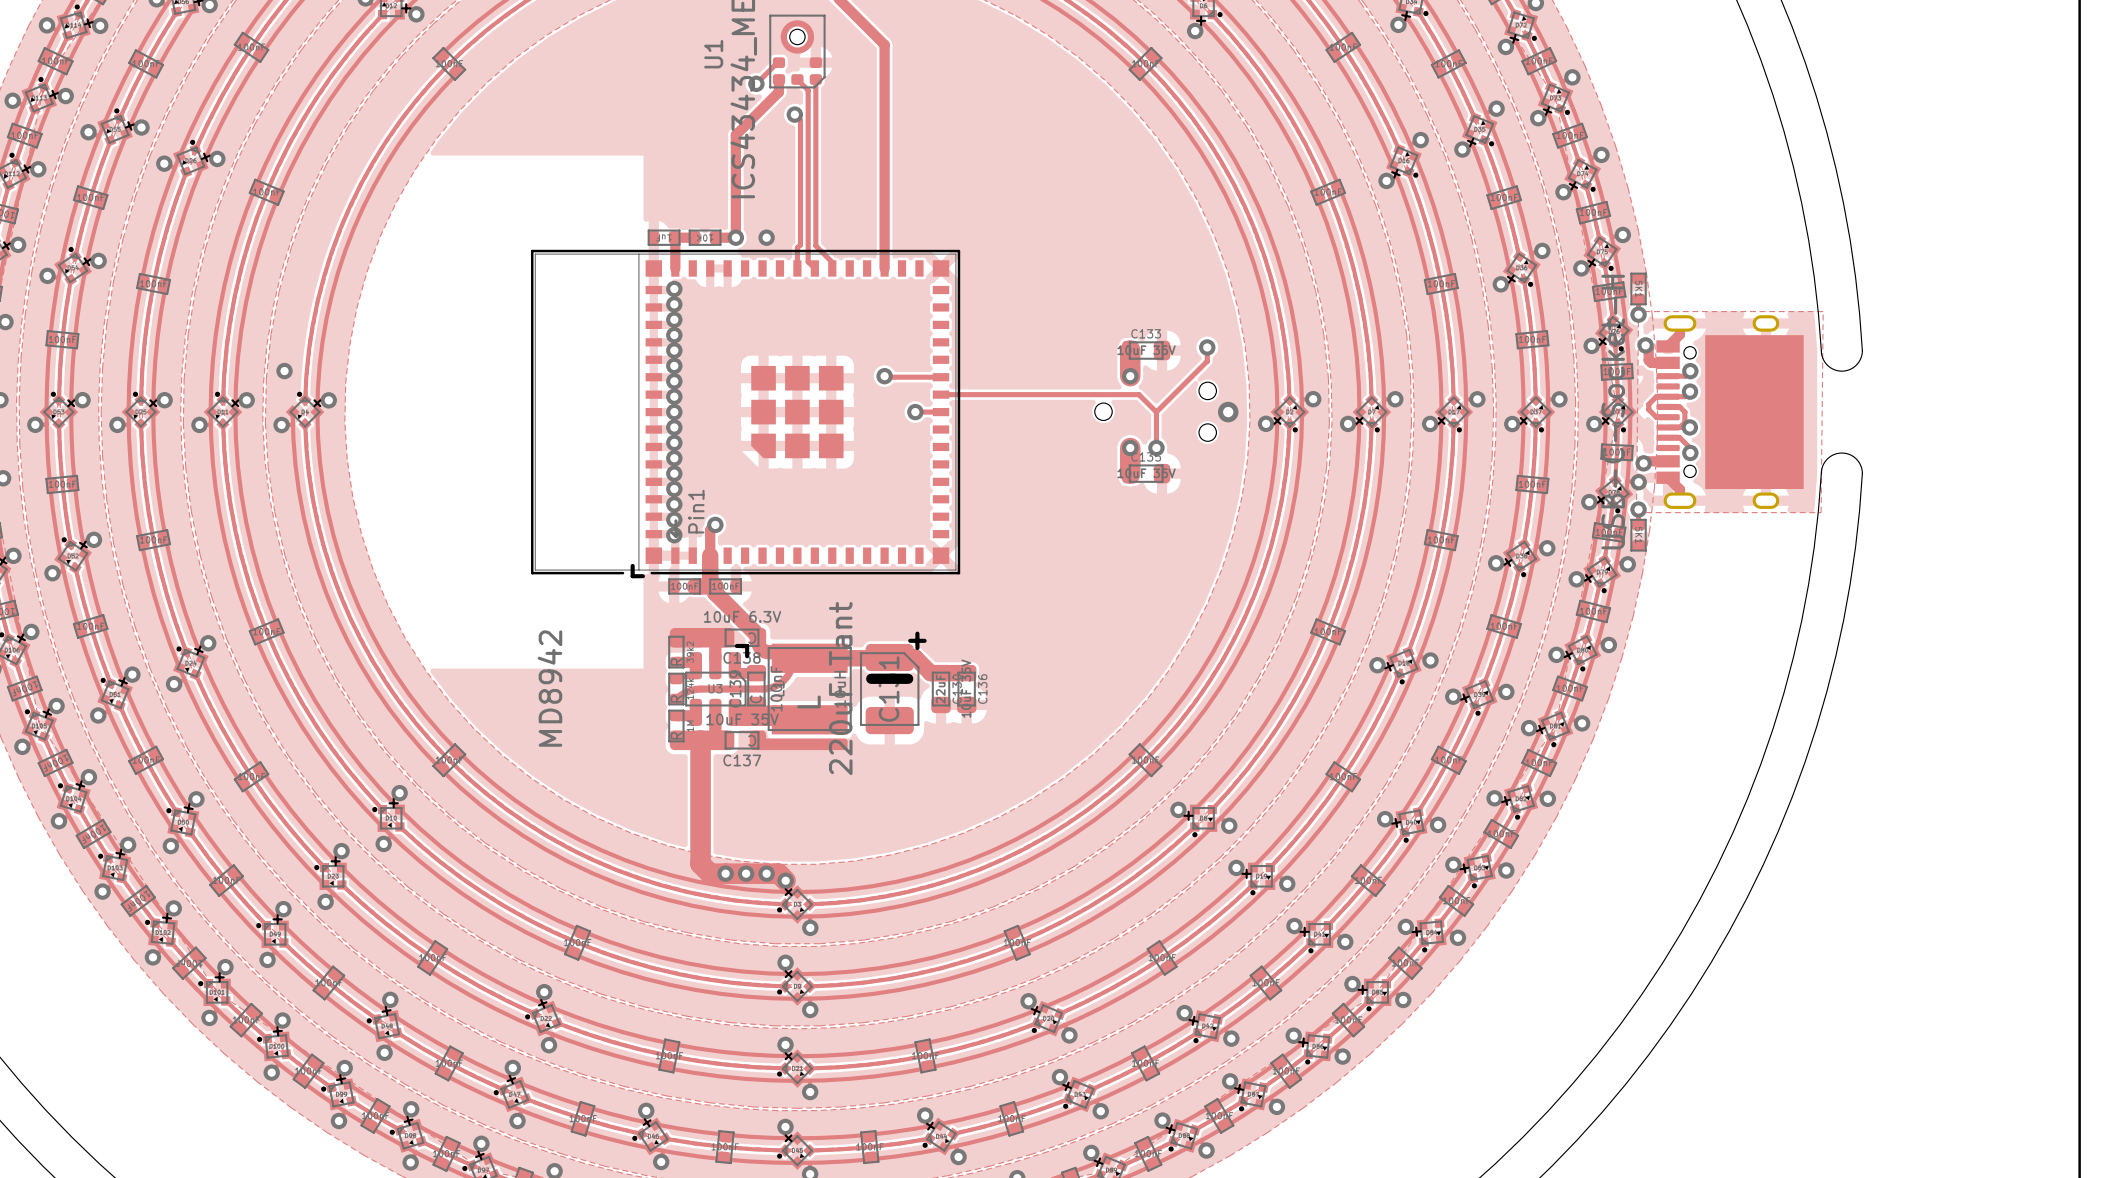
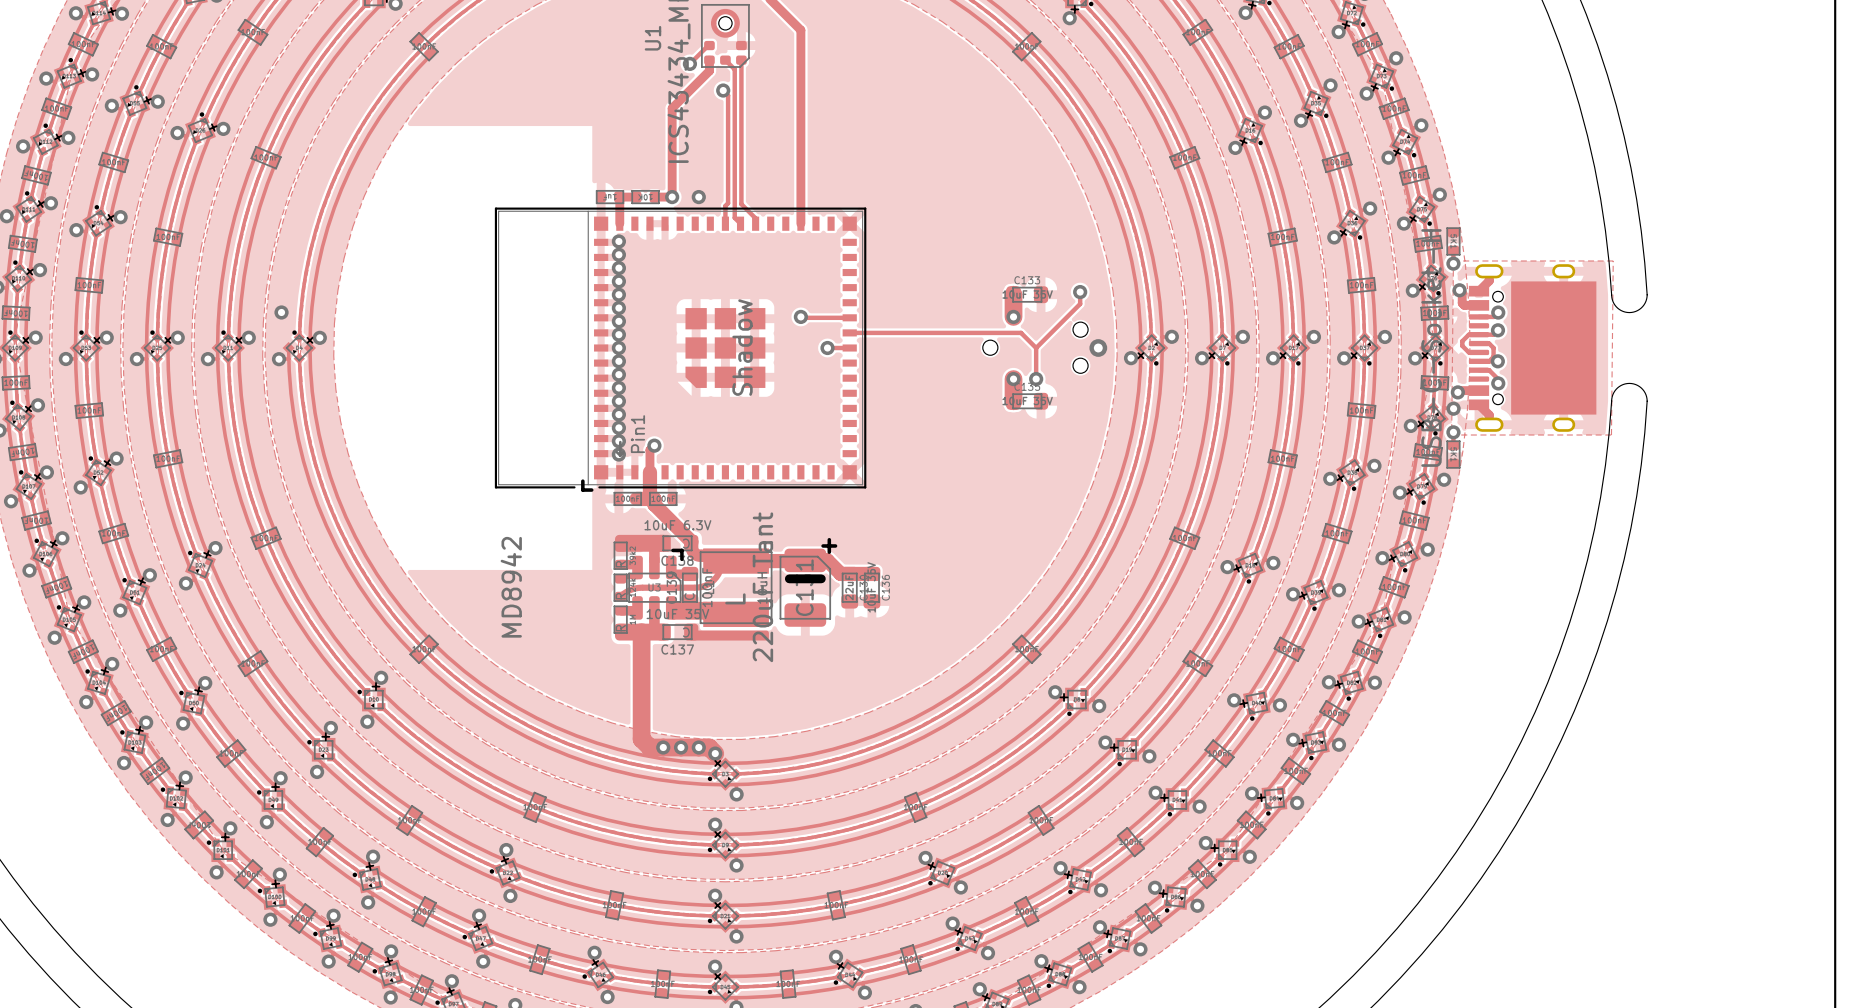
drawing: none -> [732, 299, 753, 396]

